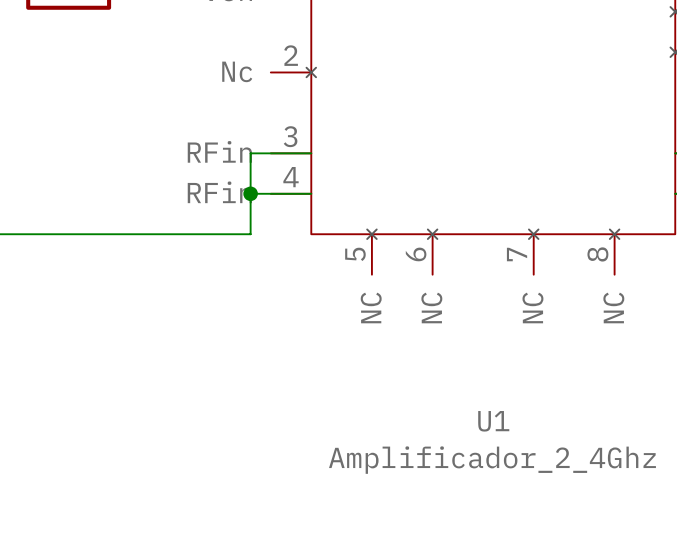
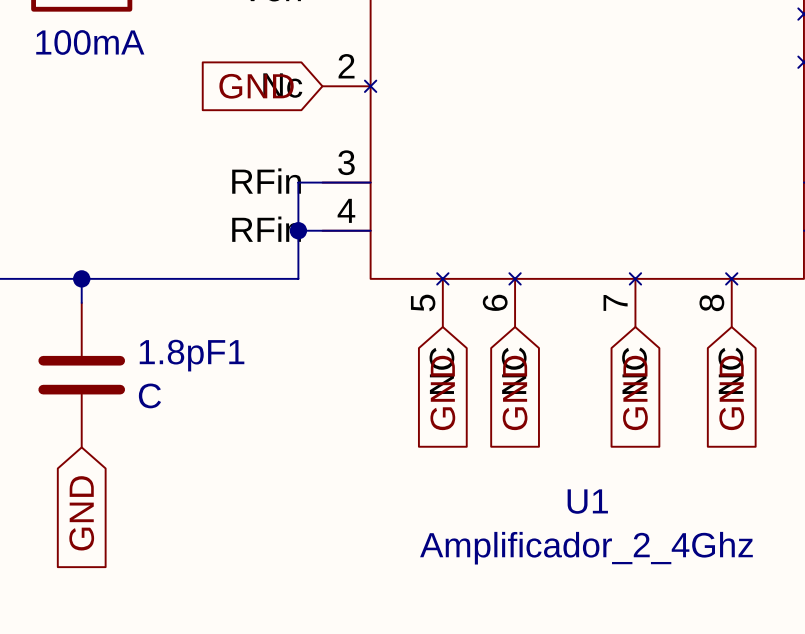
text: none -> 100mA (90, 42)
global label: none -> GND (256, 86)
wire: none -> (81, 278) (81, 302)
junction: none -> (81, 278)
1.8pF1: none -> C (81, 375)
global label: none -> GND (442, 392)
global label: none -> GND (515, 392)
global label: none -> GND (635, 392)
global label: none -> GND (731, 392)
global label: none -> GND (81, 513)

